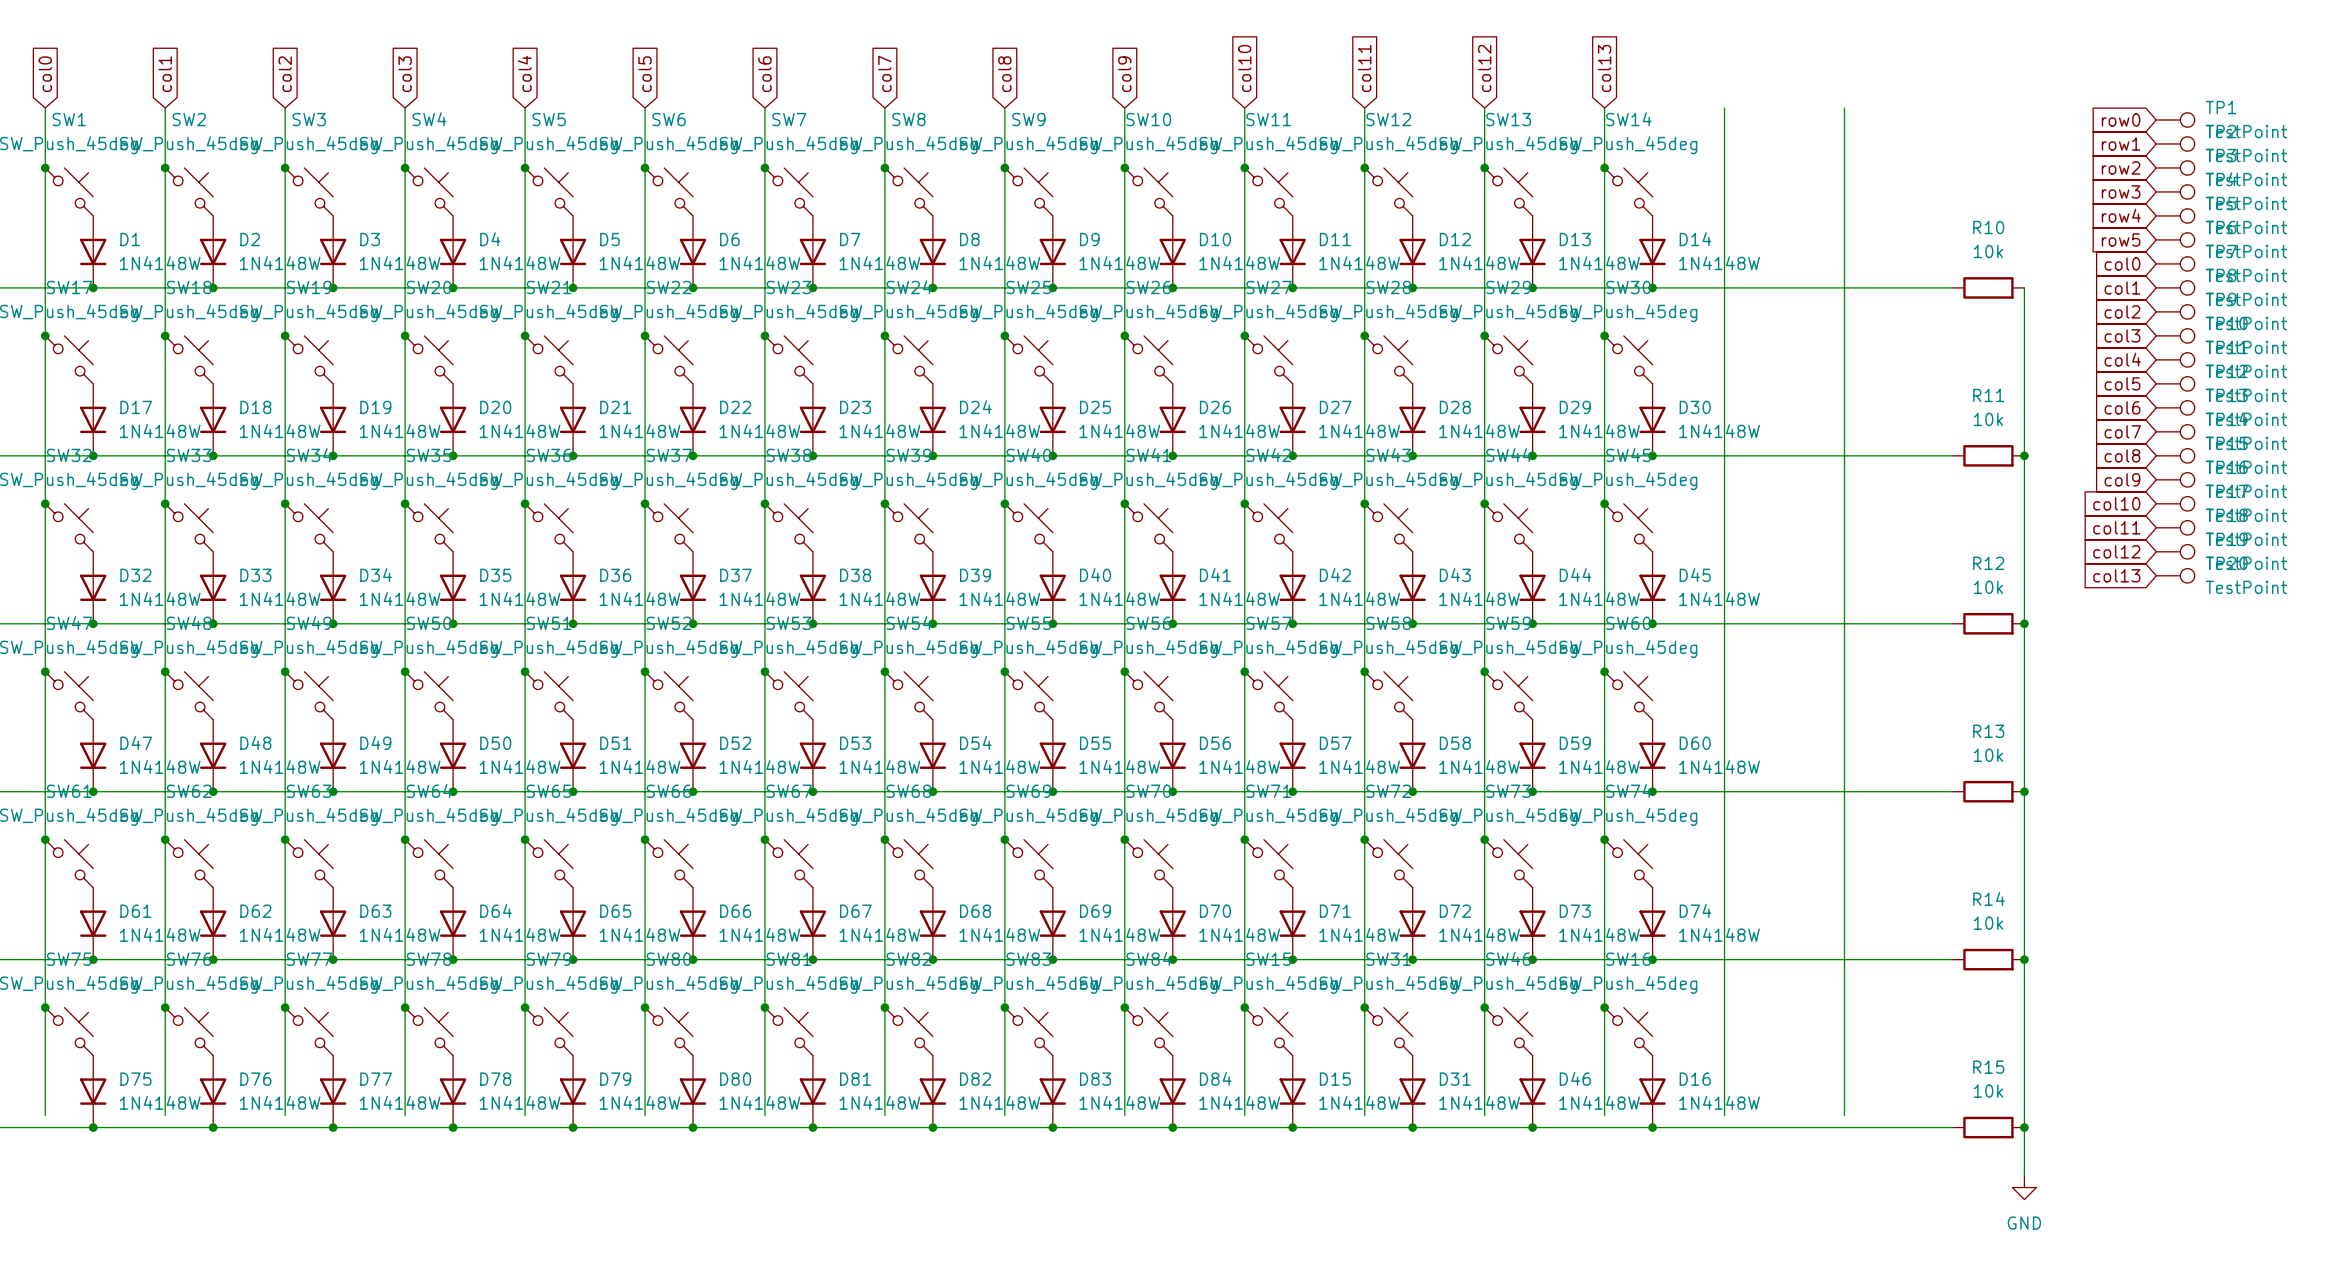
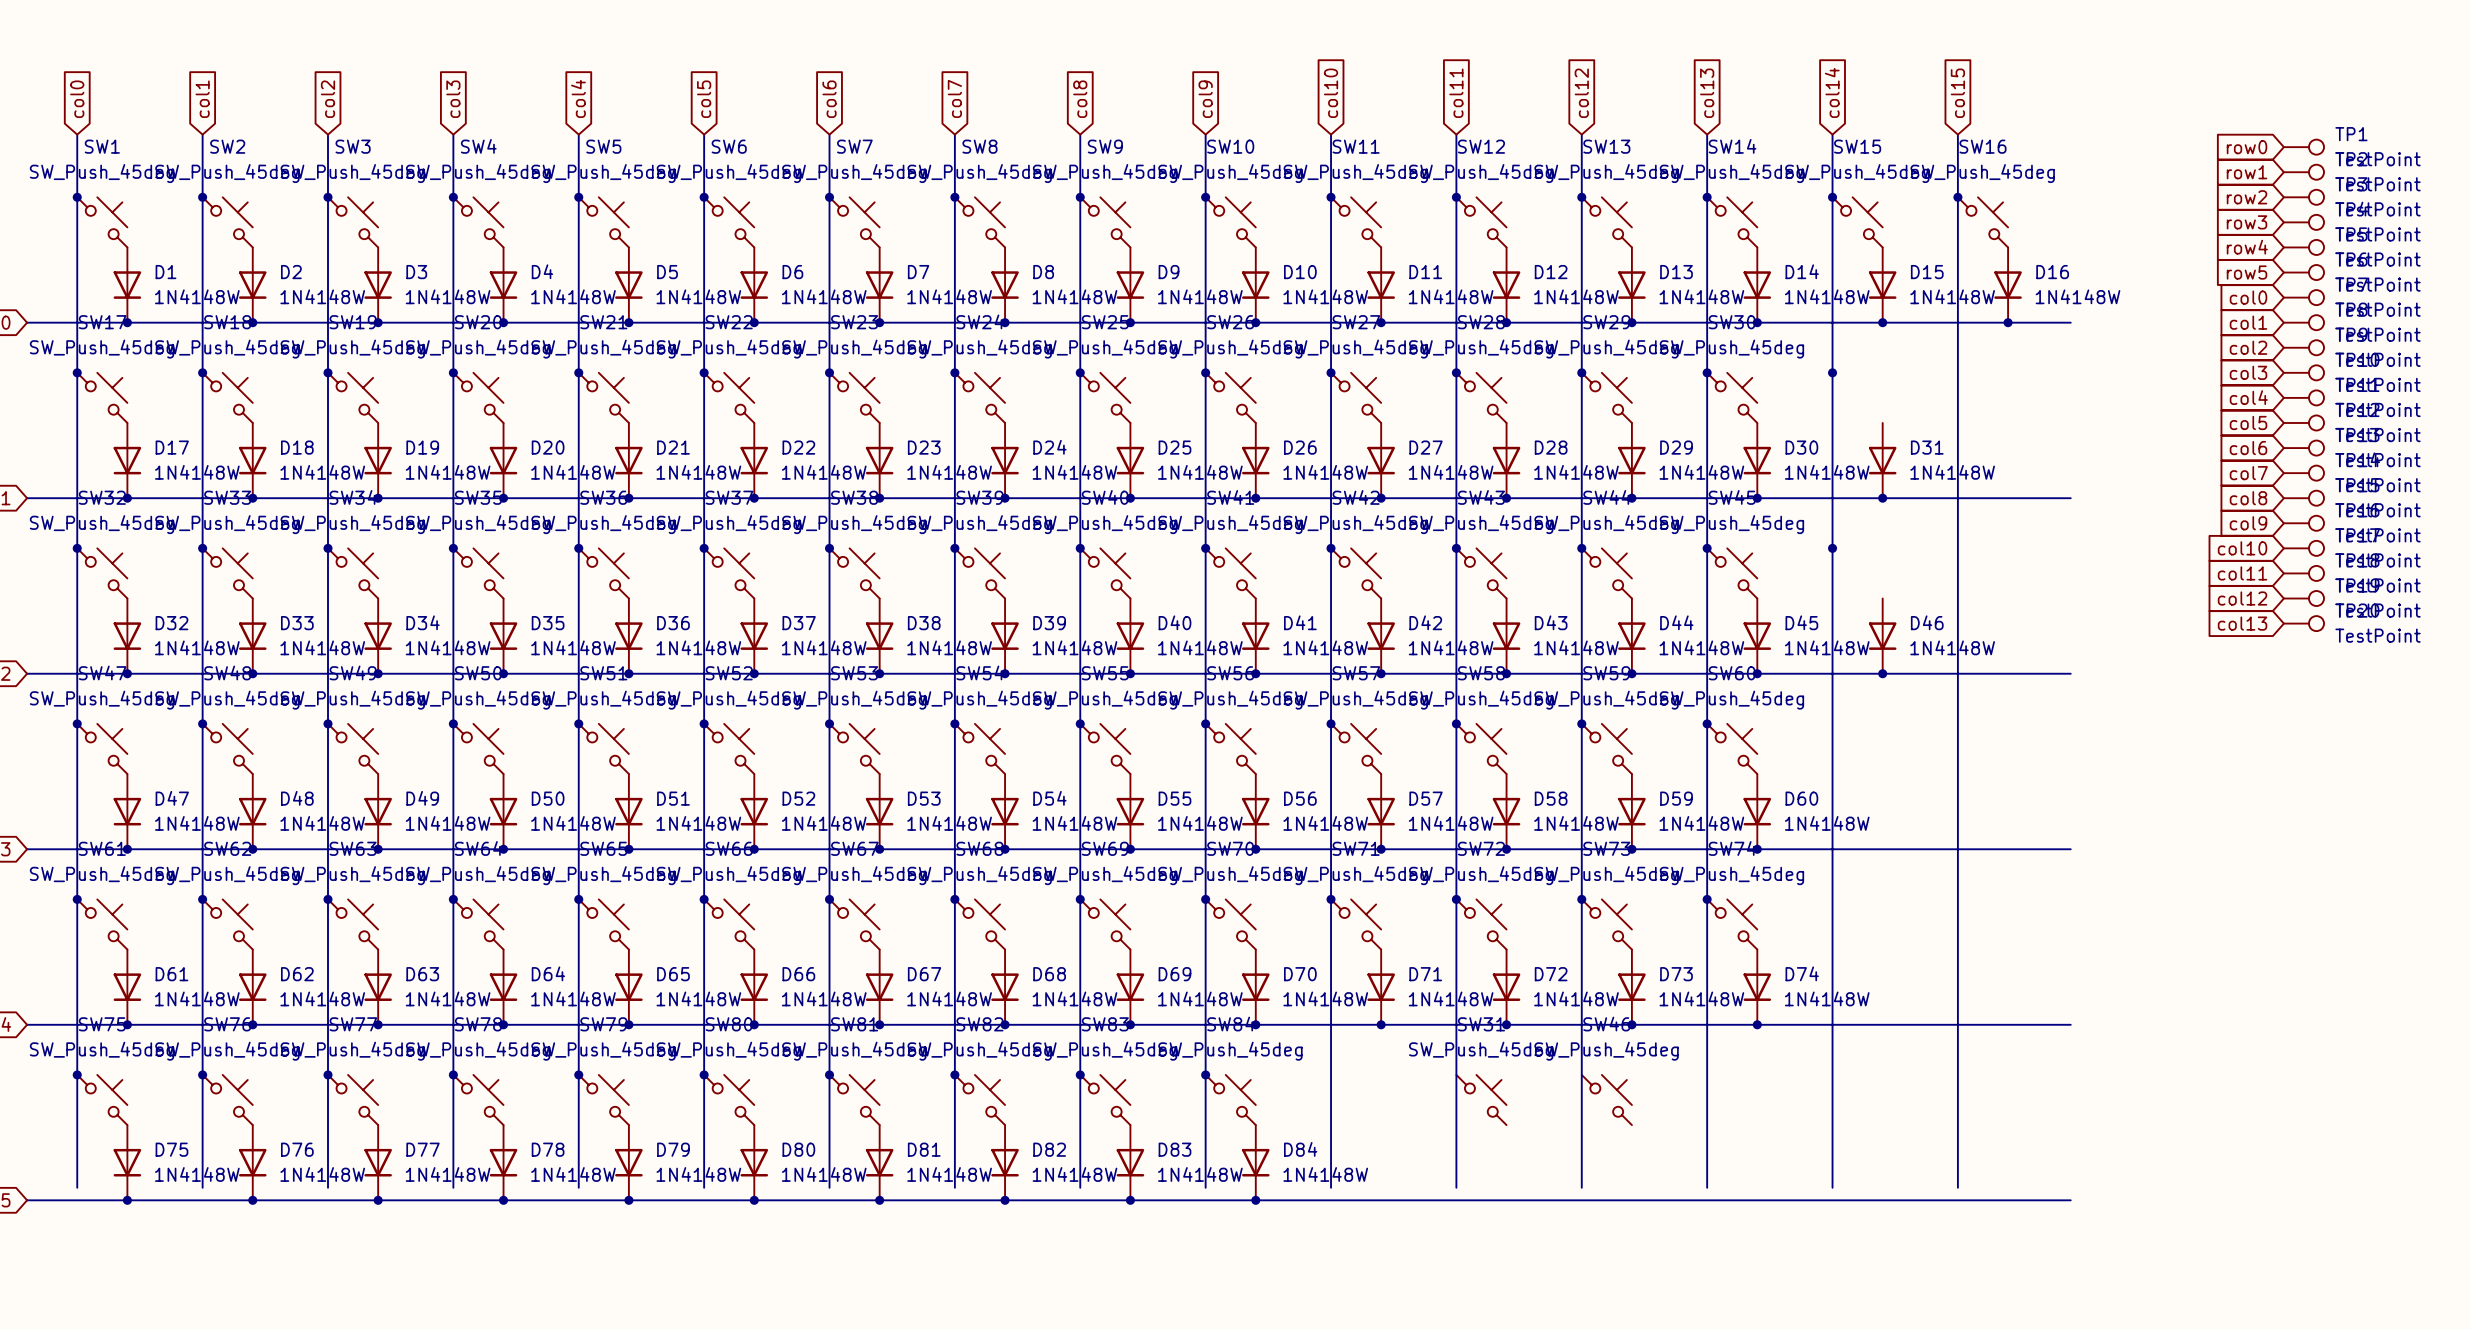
global label: none -> col14 (1832, 92)
global label: none -> col15 (1957, 93)
junction: none -> (1832, 197)
junction: none -> (1957, 197)
junction: none -> (1882, 322)
junction: none -> (2008, 322)
R10: 10k (1988, 287) -> none
wire: (2024, 287) (2024, 1175) -> none
junction: none -> (1832, 372)
junction: none -> (1882, 498)
R11: 10k (1988, 455) -> none
junction: (2024, 455) -> none
junction: none -> (1832, 548)
junction: none -> (1882, 673)
R12: 10k (1988, 623) -> none
junction: (2024, 623) -> none
R13: 10k (1988, 791) -> none
junction: (2024, 791) -> none
R14: 10k (1988, 959) -> none
junction: (2024, 959) -> none
junction: (1244, 1007) -> none
junction: (1364, 1007) -> none
junction: (1484, 1007) -> none
junction: (1604, 1007) -> none
SW15 position: (1268, 1031) -> (1857, 222)
SW16 position: (1628, 1031) -> (1982, 222)
D15 position: (1292, 1091) -> (1882, 285)
D31 position: (1412, 1091) -> (1882, 460)
D46 position: (1532, 1091) -> (1882, 636)
D16 position: (1652, 1091) -> (2008, 285)
junction: (1292, 1127) -> none
junction: (1412, 1127) -> none
junction: (1532, 1127) -> none
junction: (1652, 1127) -> none
R15: 10k (1988, 1127) -> none
junction: (2024, 1127) -> none
power symbol: GND (2024, 1187) -> none

